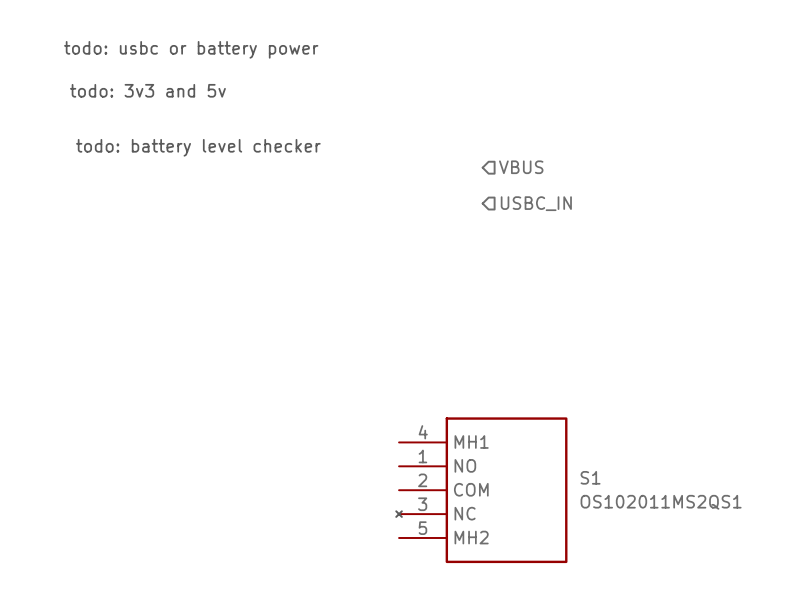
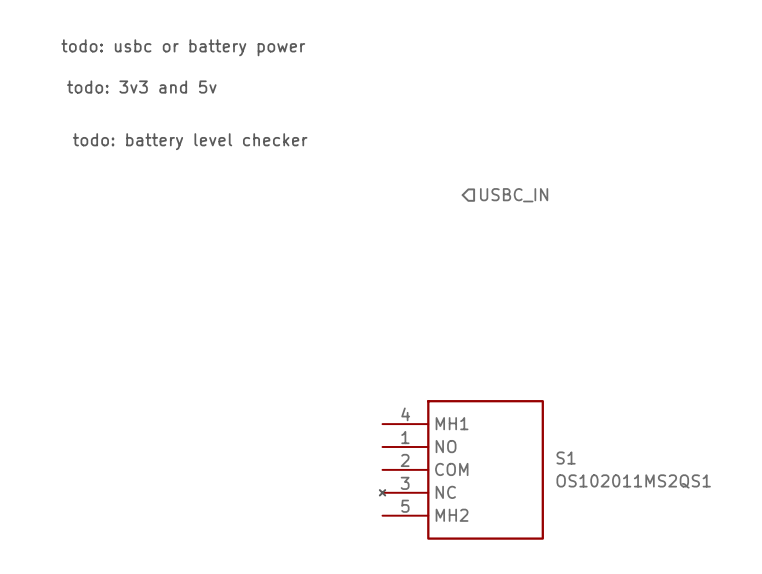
hierarchical label: VBUS (521, 167) -> none

